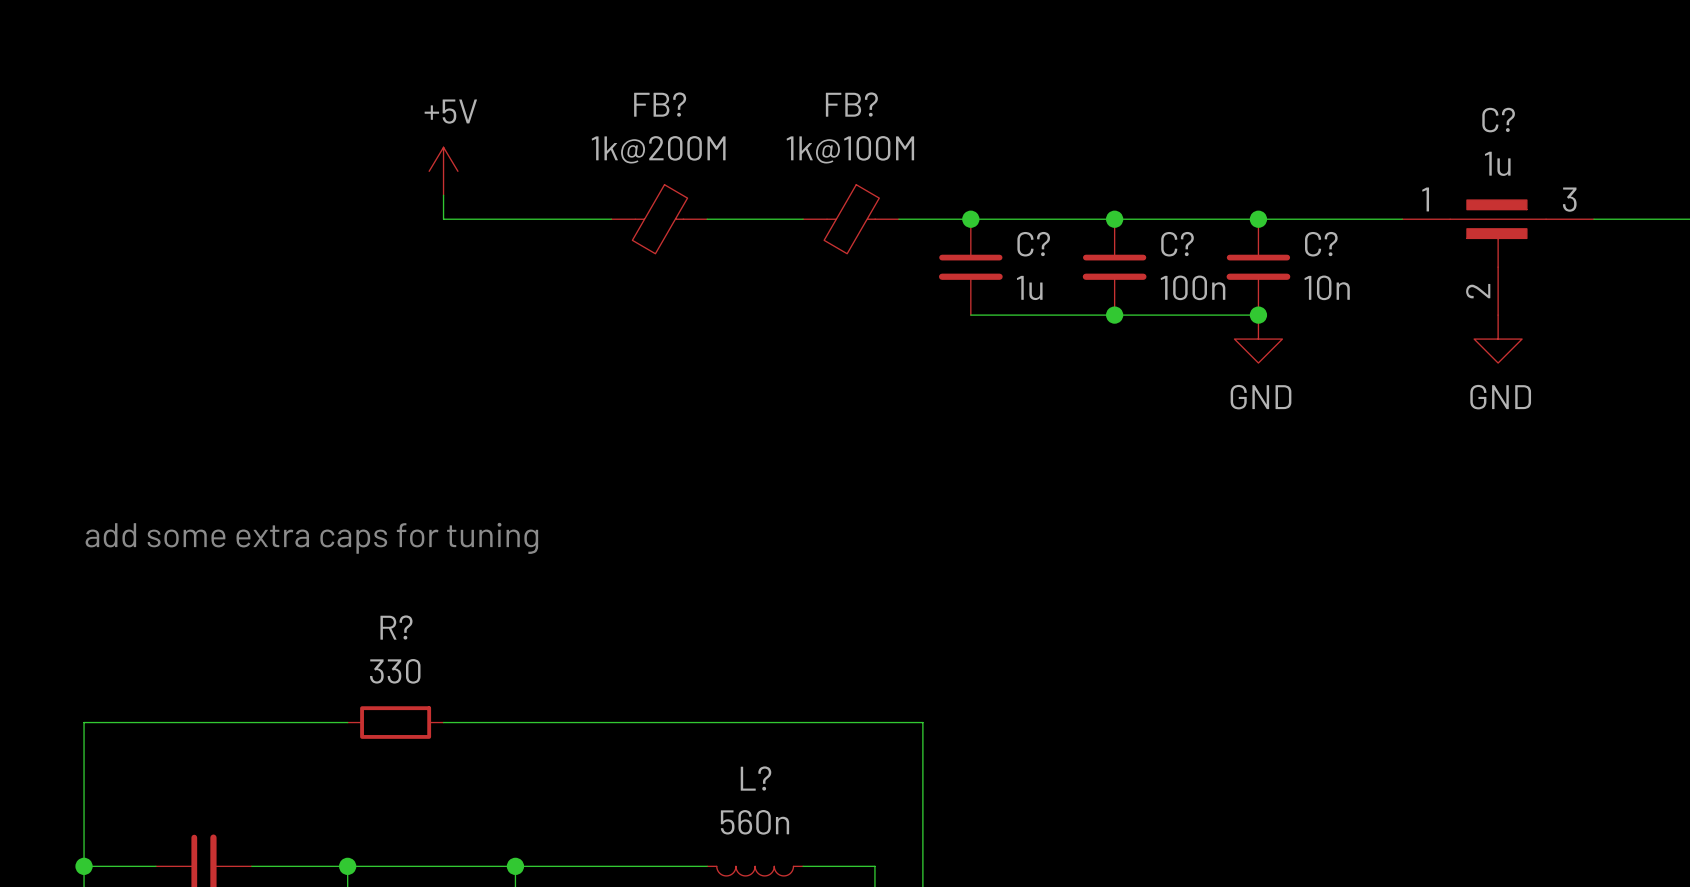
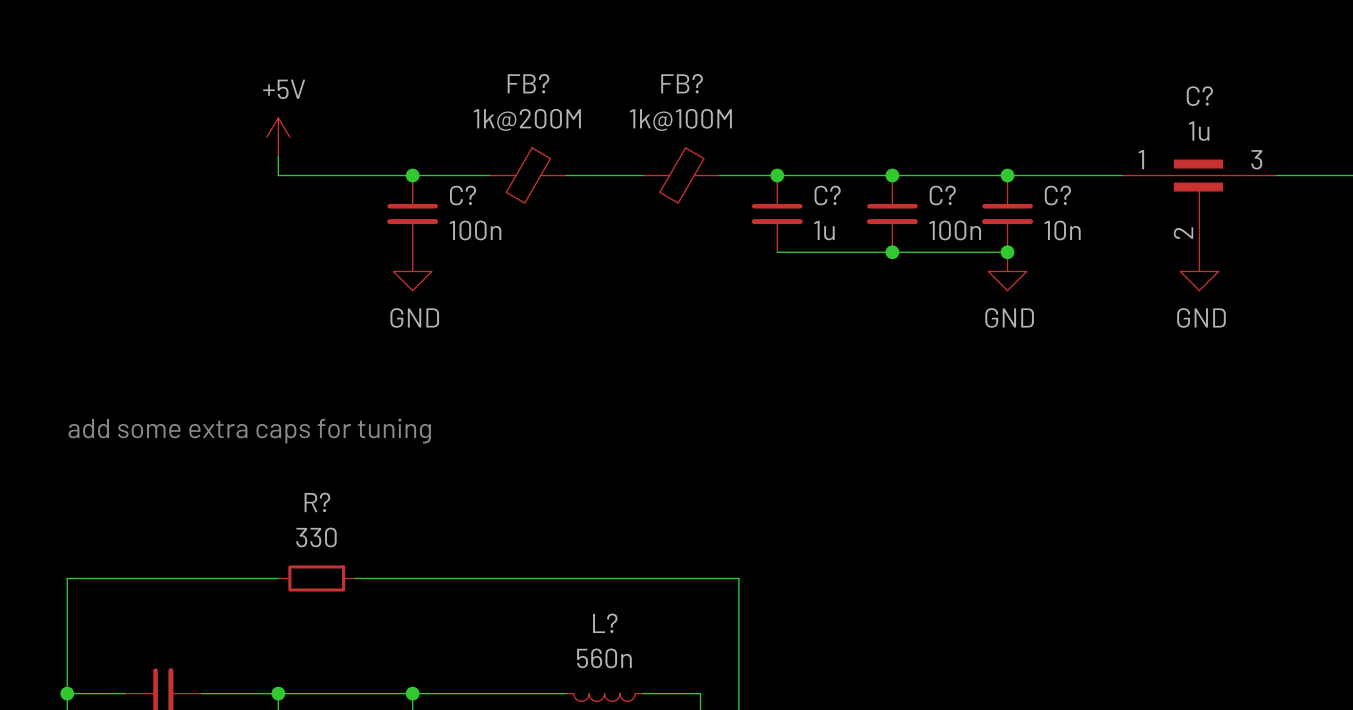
power symbol position: +5V (443, 171) -> +5V (278, 137)
wire: (443, 195) (443, 219) -> (278, 156) (278, 175) (355, 175)
junction: none -> (412, 175)
C?: none -> 100n (412, 213)
power symbol: none -> GND (412, 271)

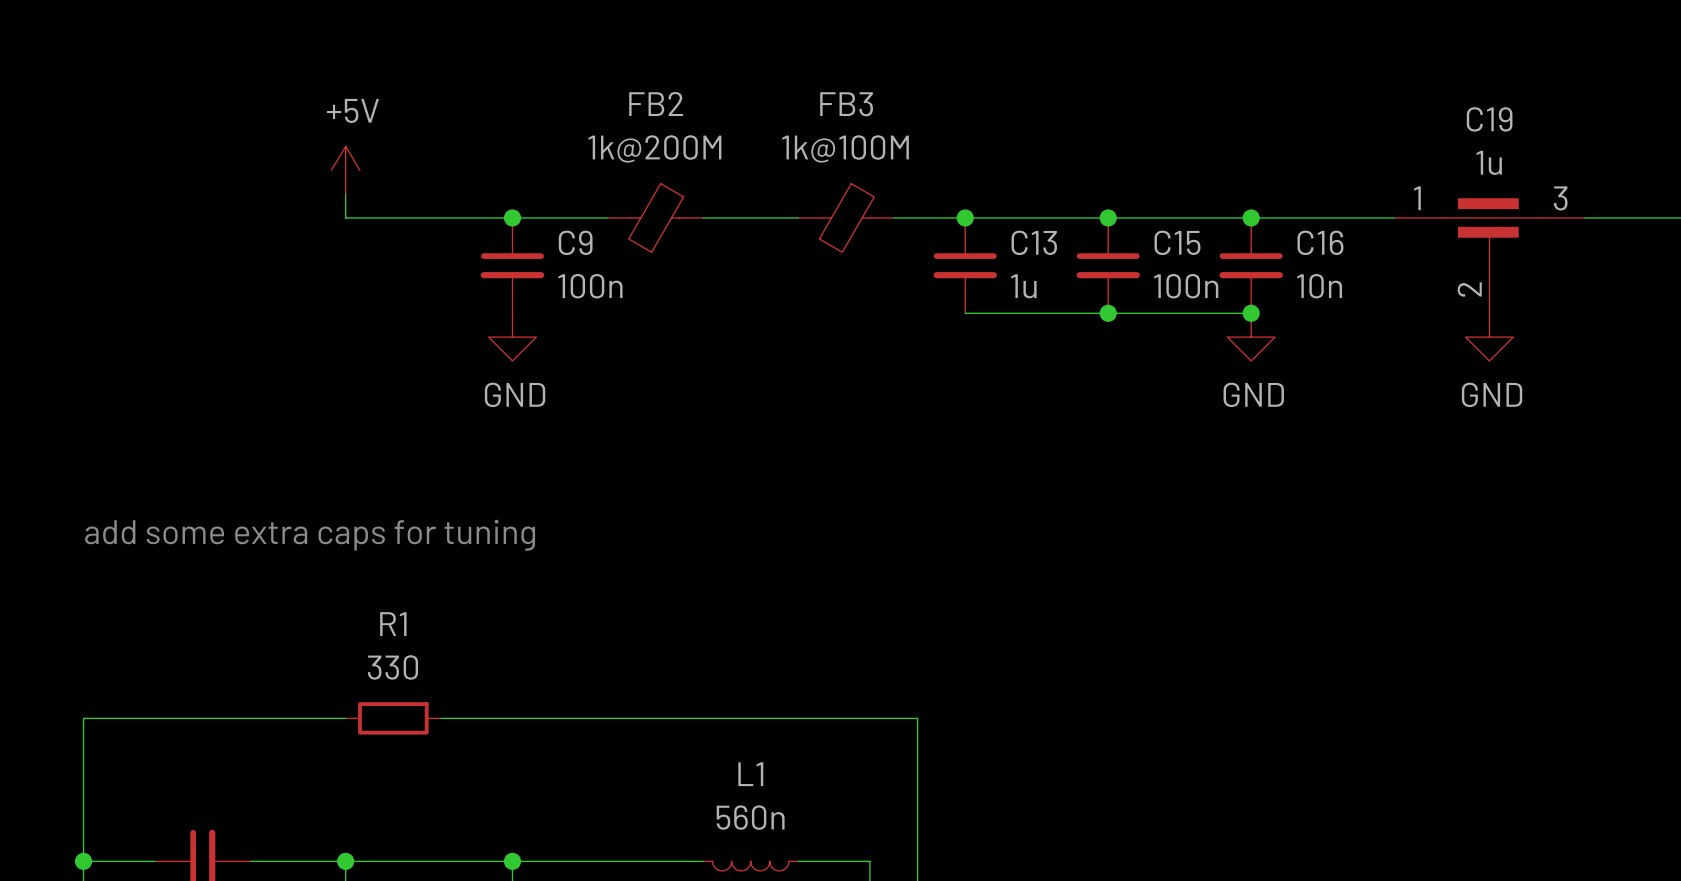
FB? name: FB? (528, 83) -> FB2 (656, 103)
FB? name: FB? (682, 83) -> FB3 (846, 104)
C? name: C? (1199, 96) -> C19 (1489, 119)
C? name: C? (463, 195) -> C9 (575, 242)
C? name: C? (827, 195) -> C13 (1034, 242)
C? name: C? (942, 195) -> C15 (1177, 242)
C? name: C? (1057, 195) -> C16 (1320, 242)
R? name: R? (317, 502) -> R1 (393, 624)
L? name: L? (605, 623) -> L1 (750, 774)

